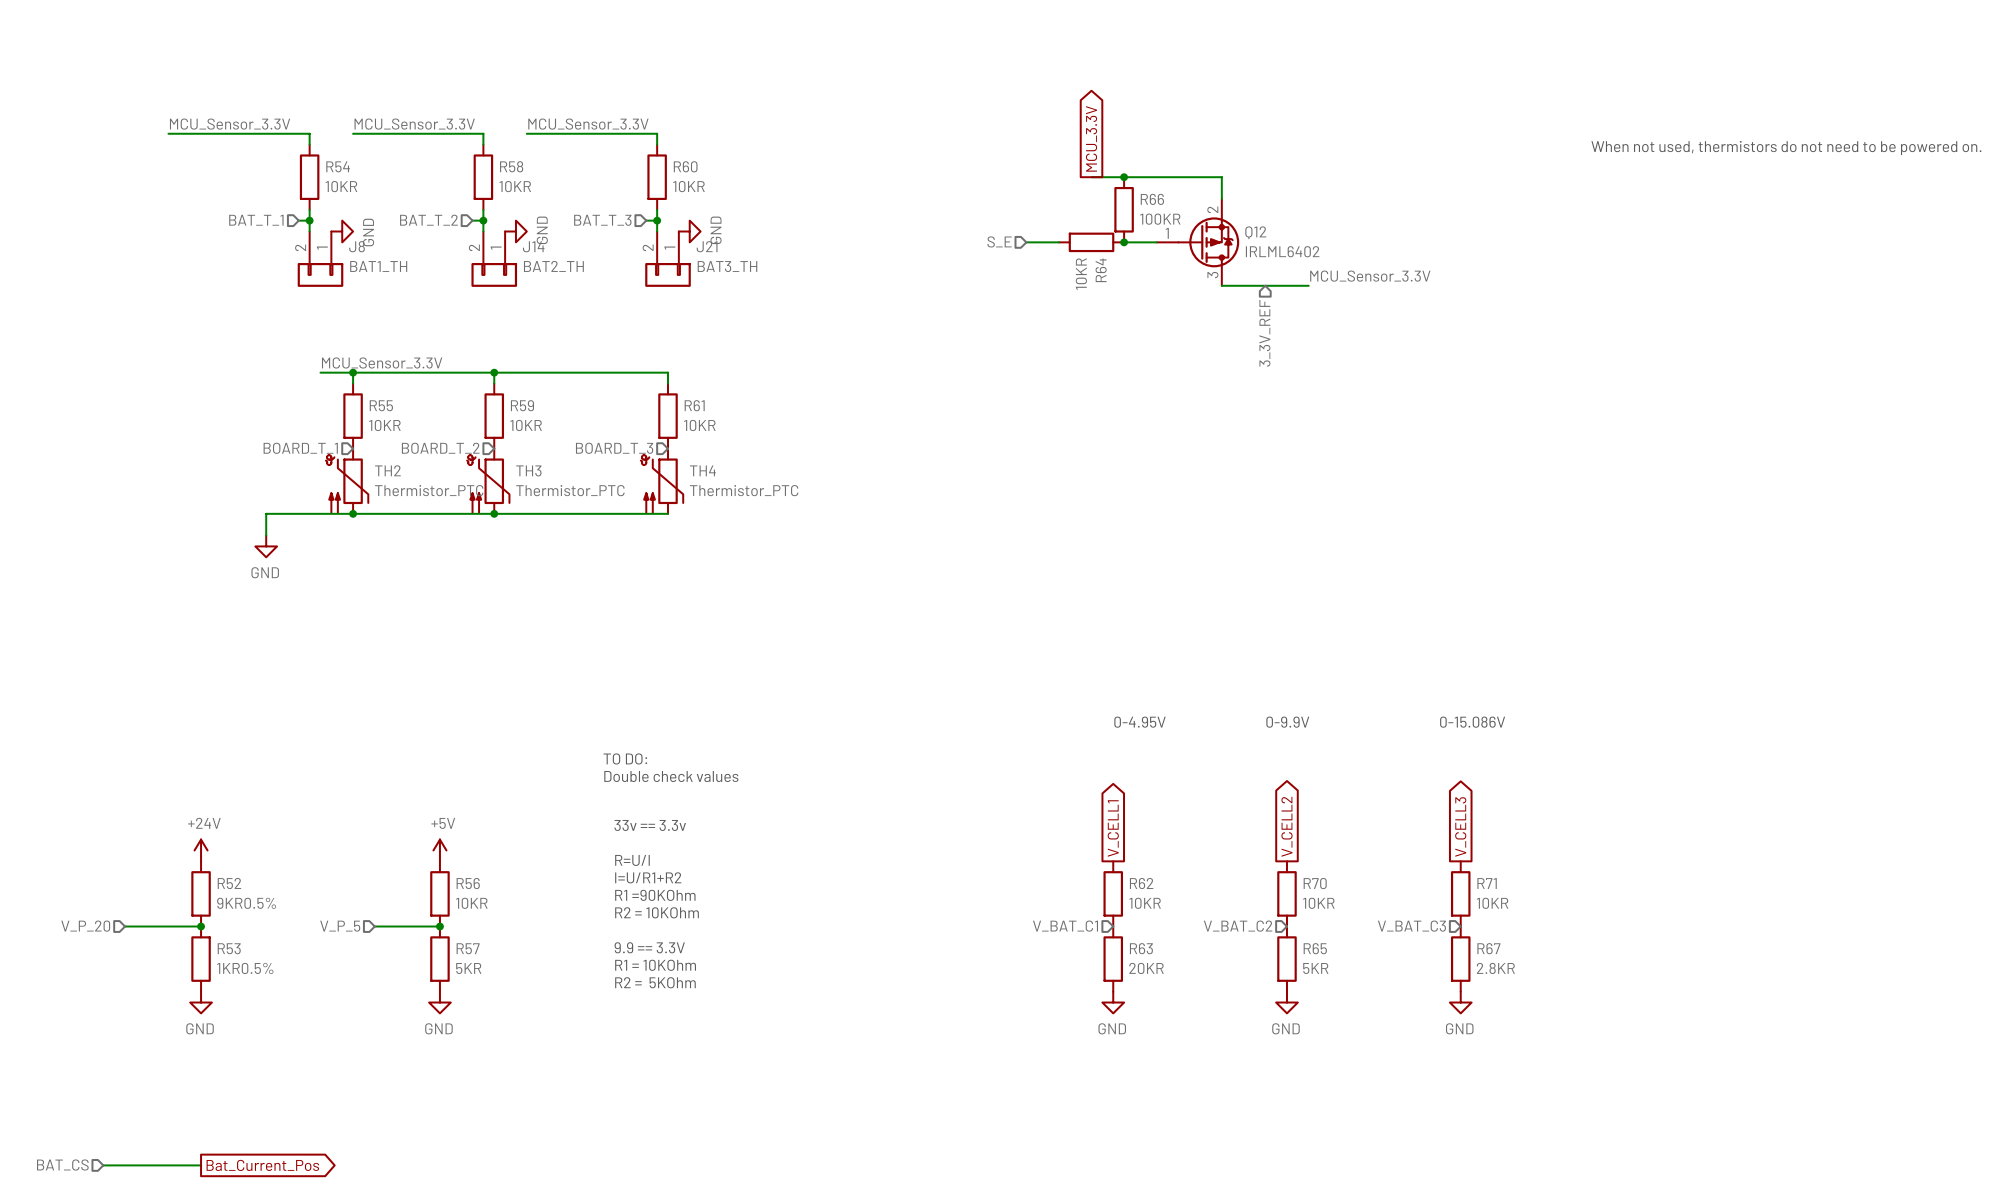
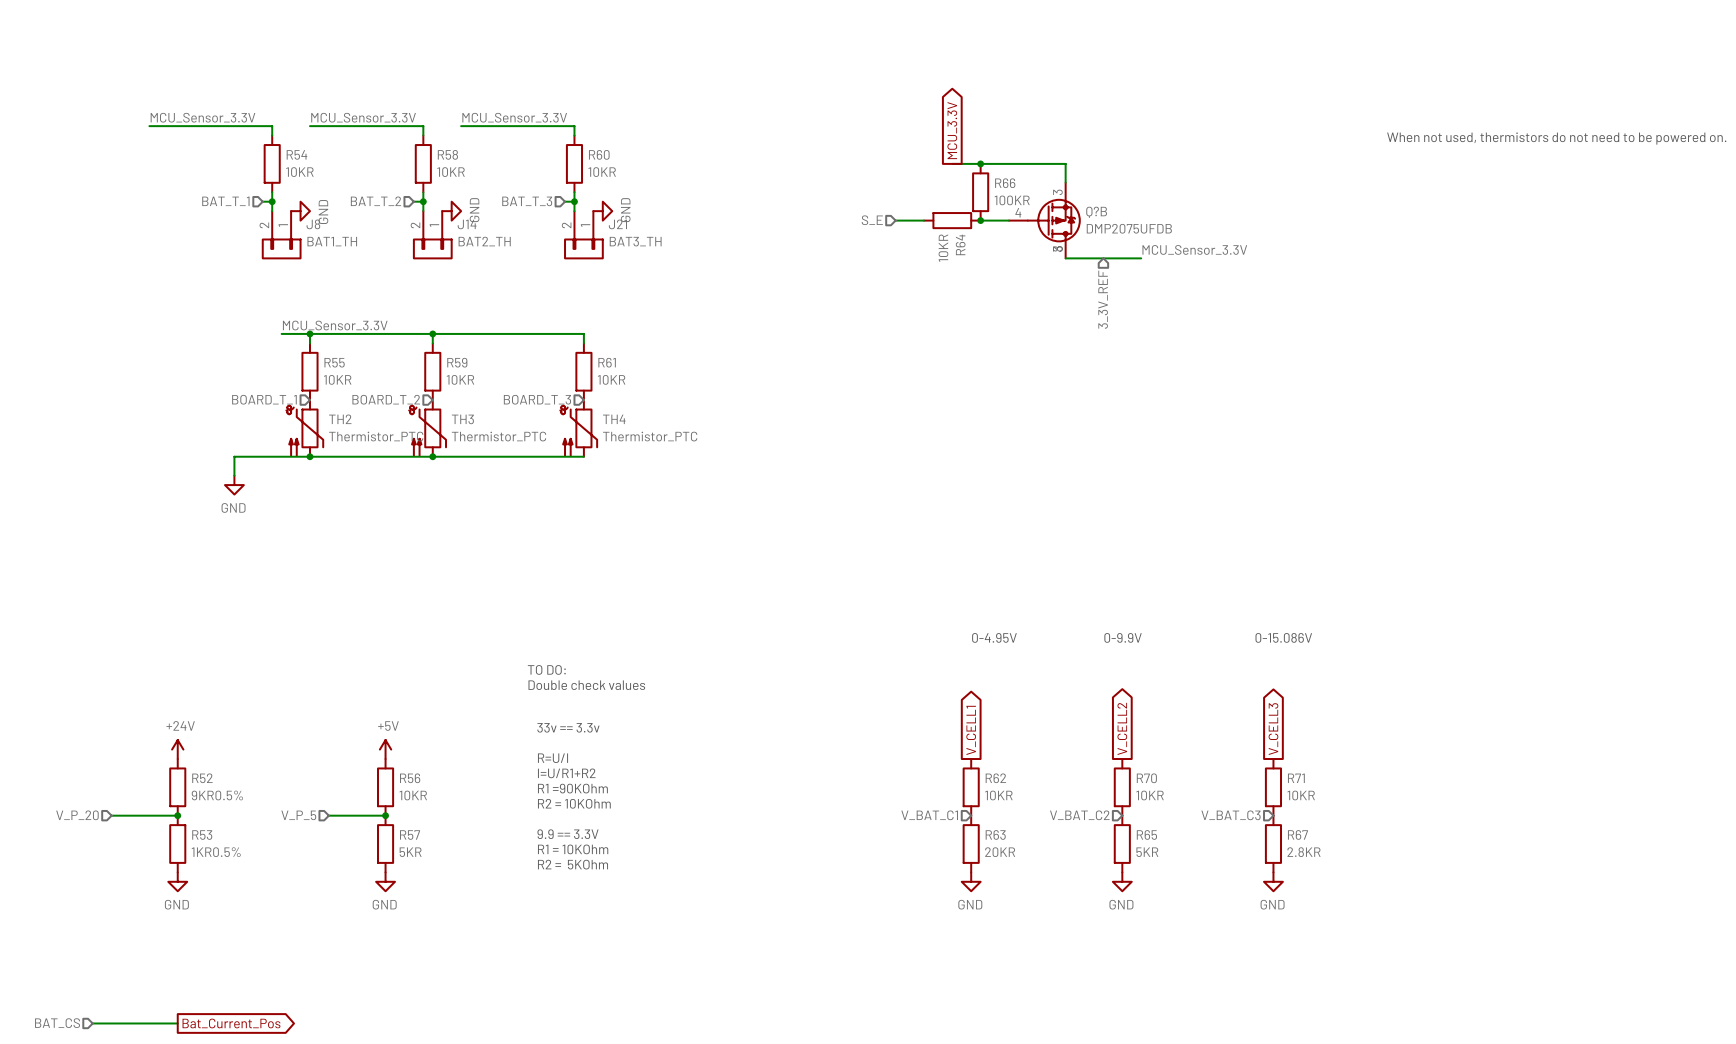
Q12 symbol: [1156, 198, 1240, 286] -> [1008, 182, 1081, 259]
Q12 name: Q12 (1255, 232) -> Q?B (1096, 212)
Q12 value: IRLML6402 (1282, 251) -> DMP2075UFDB (1129, 228)

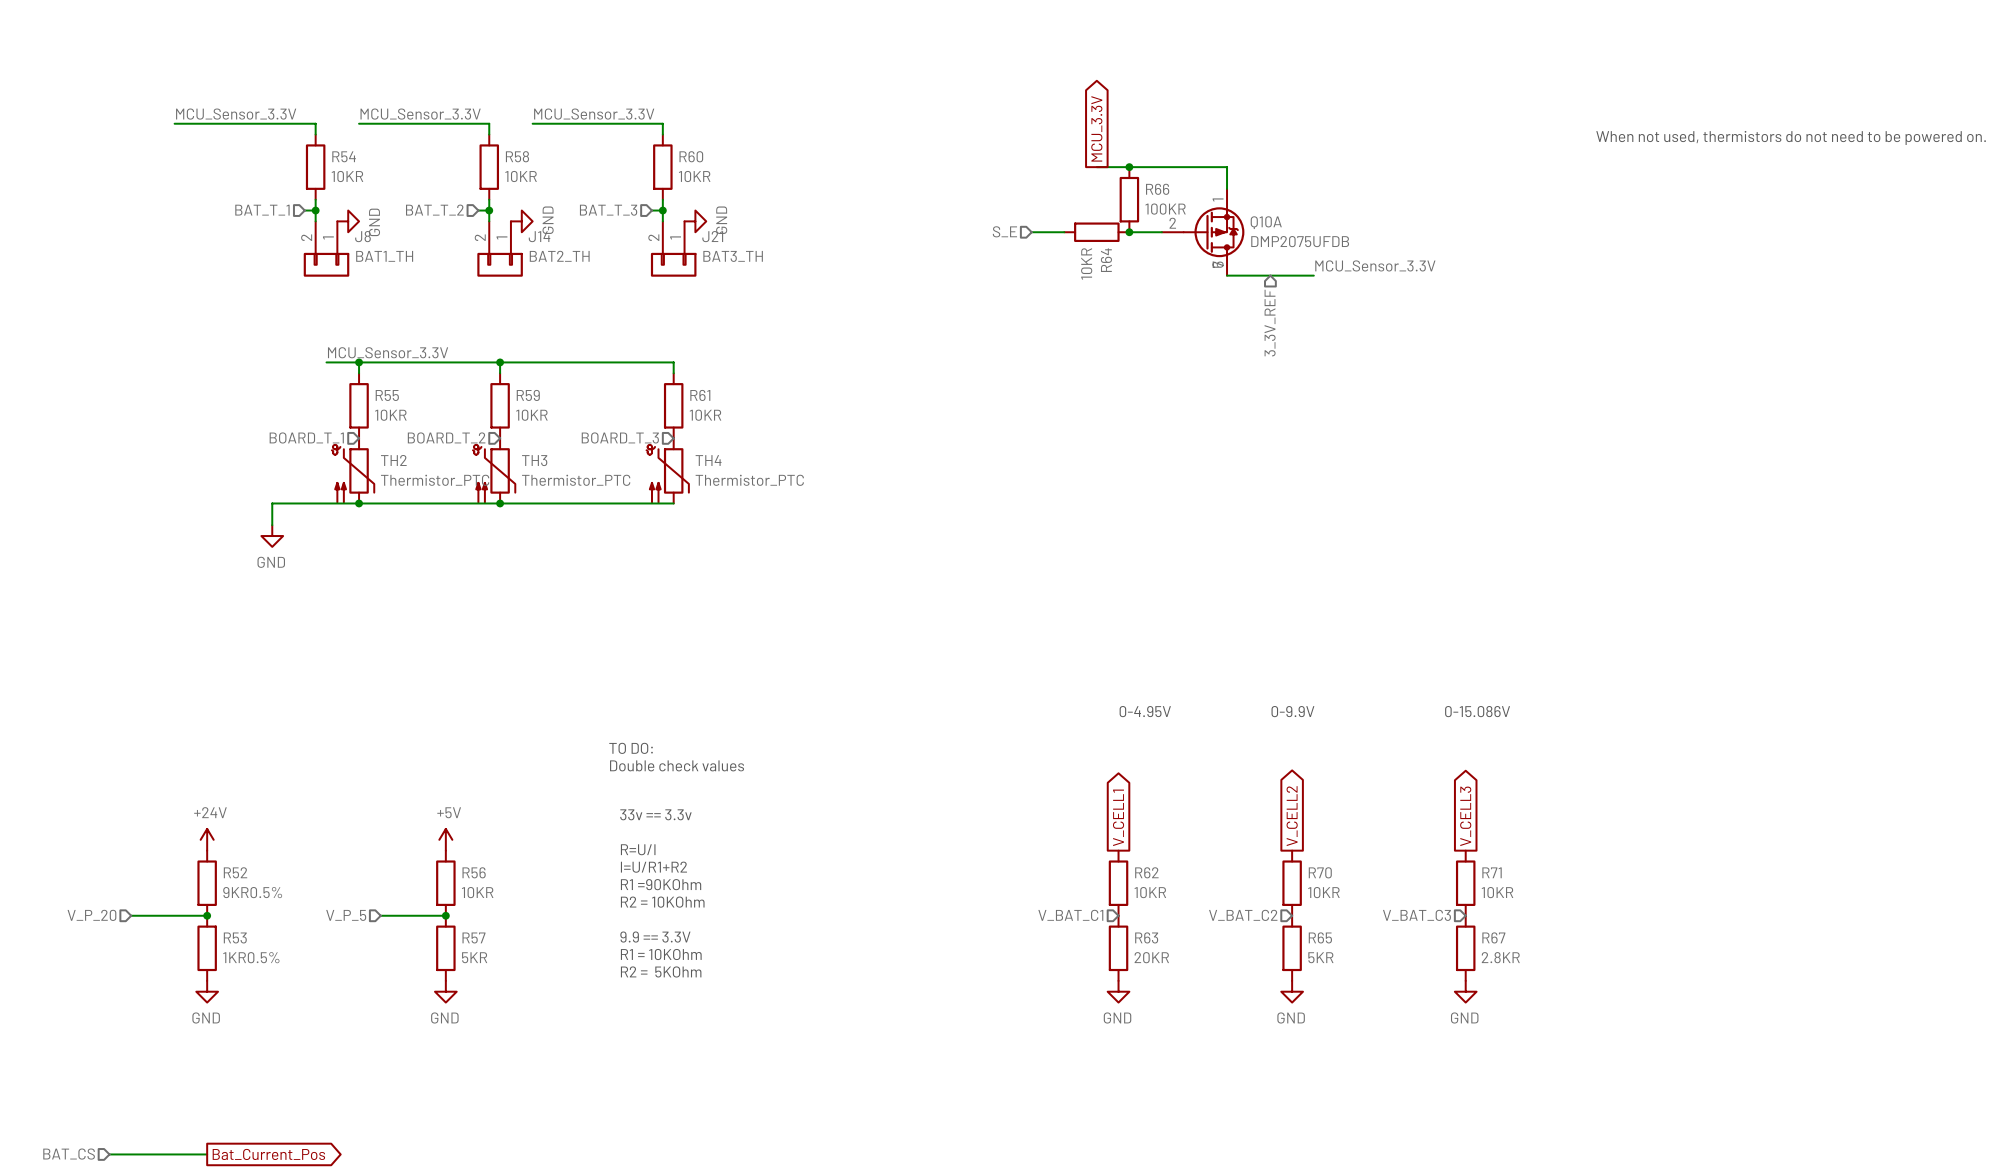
Q?B symbol: [1008, 182, 1081, 259] -> [1161, 188, 1245, 276]
Q?B name: Q?B (1096, 212) -> Q10A (1266, 222)

